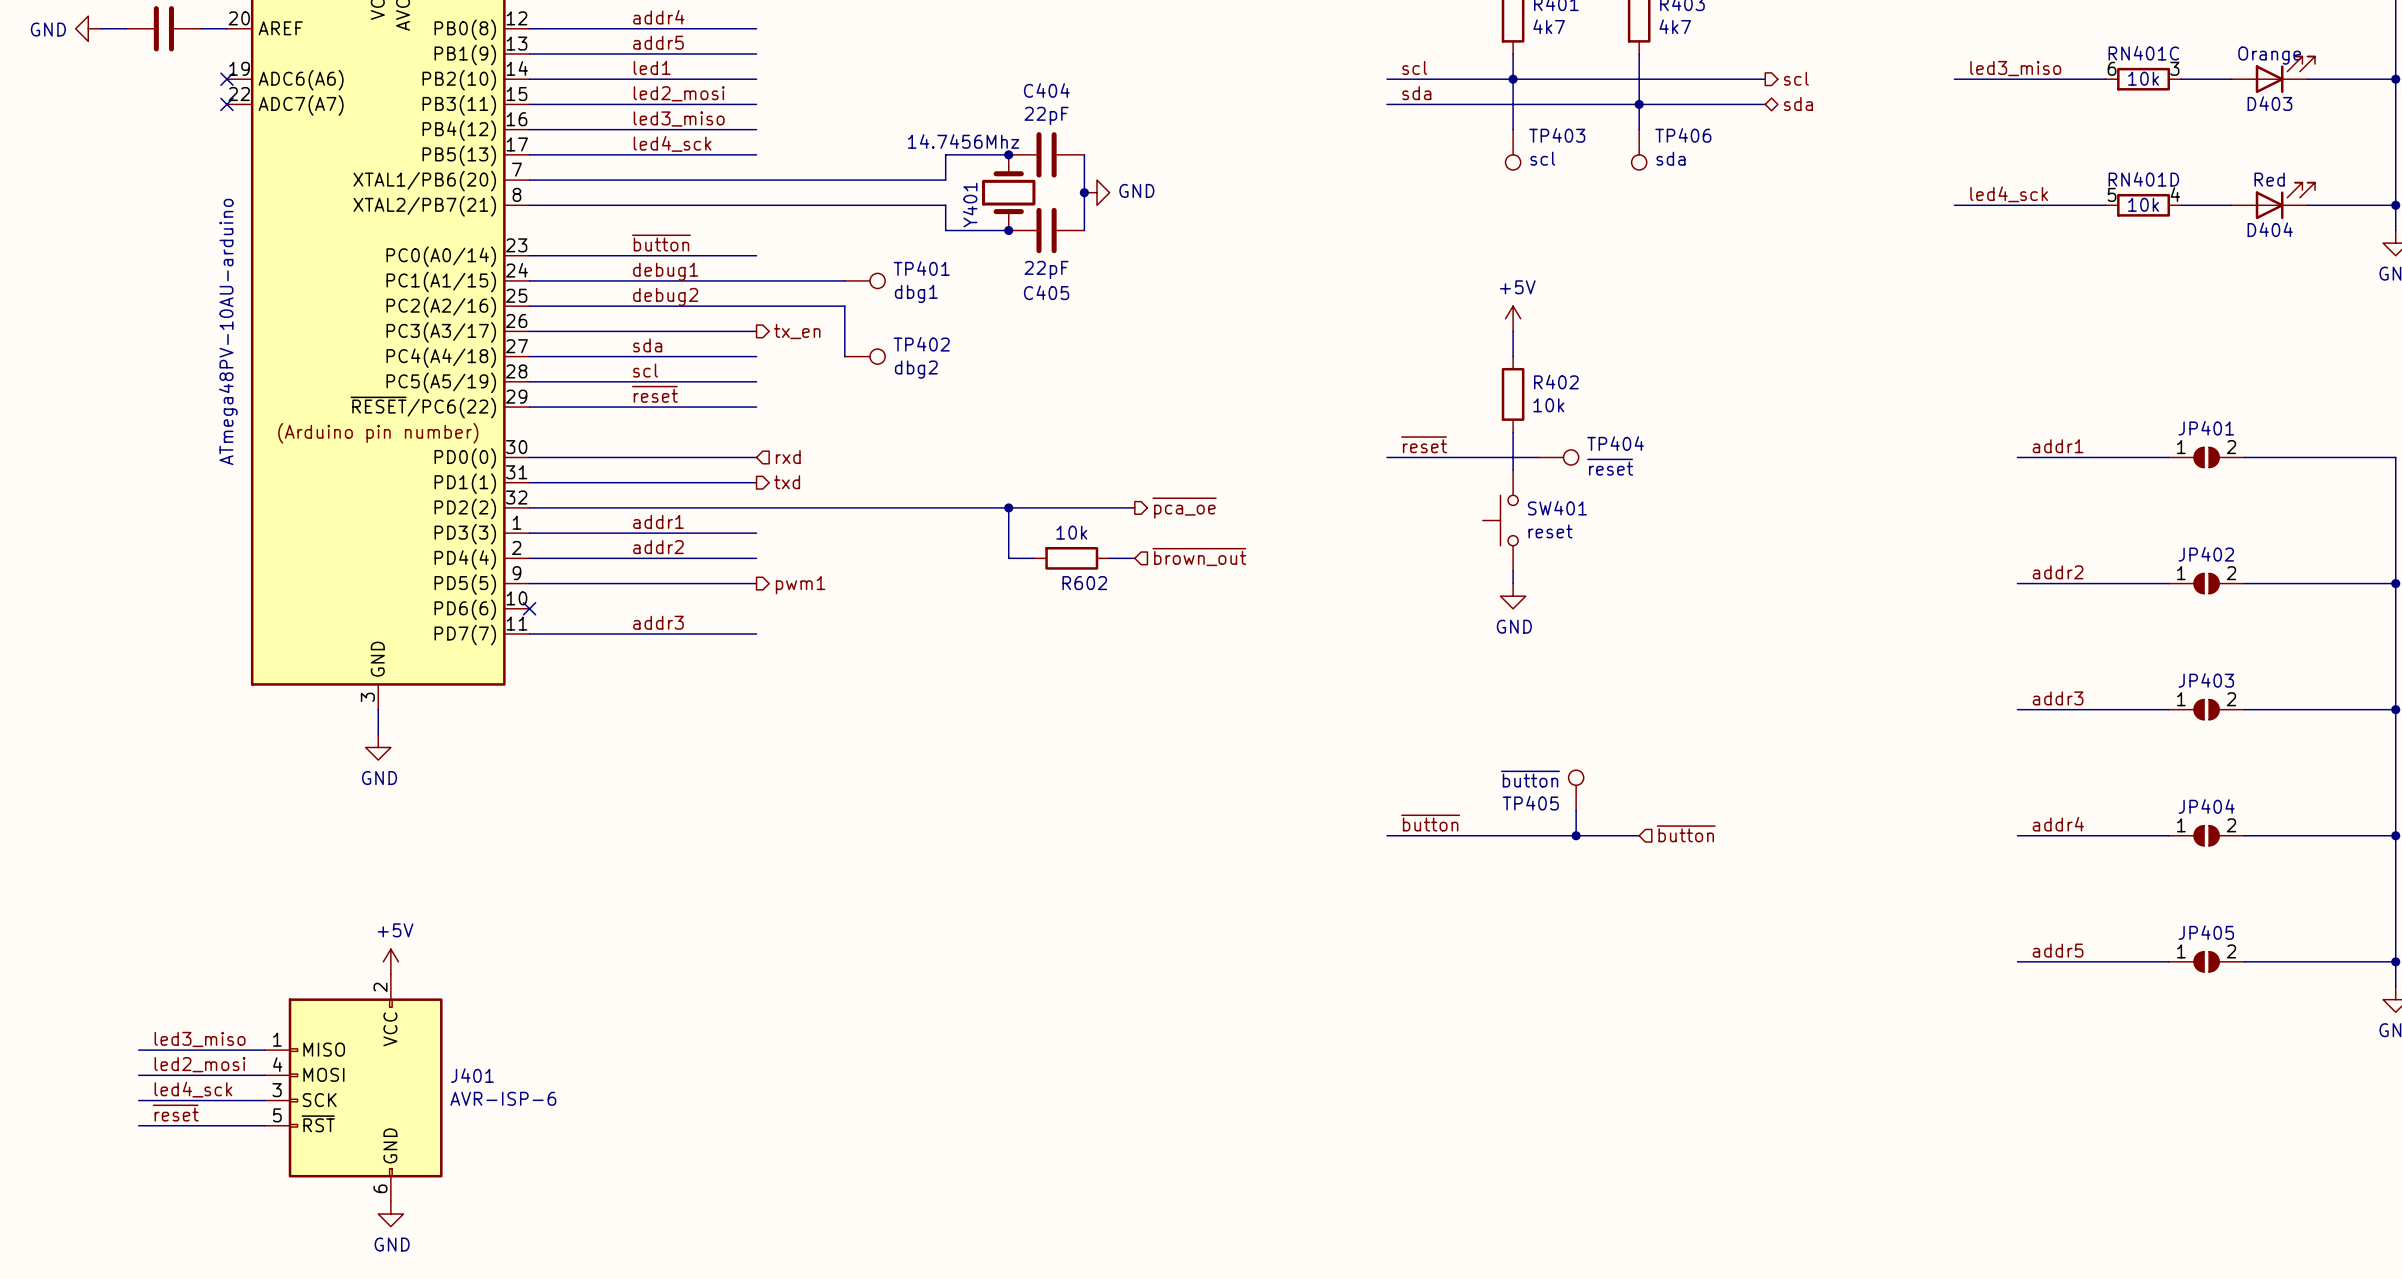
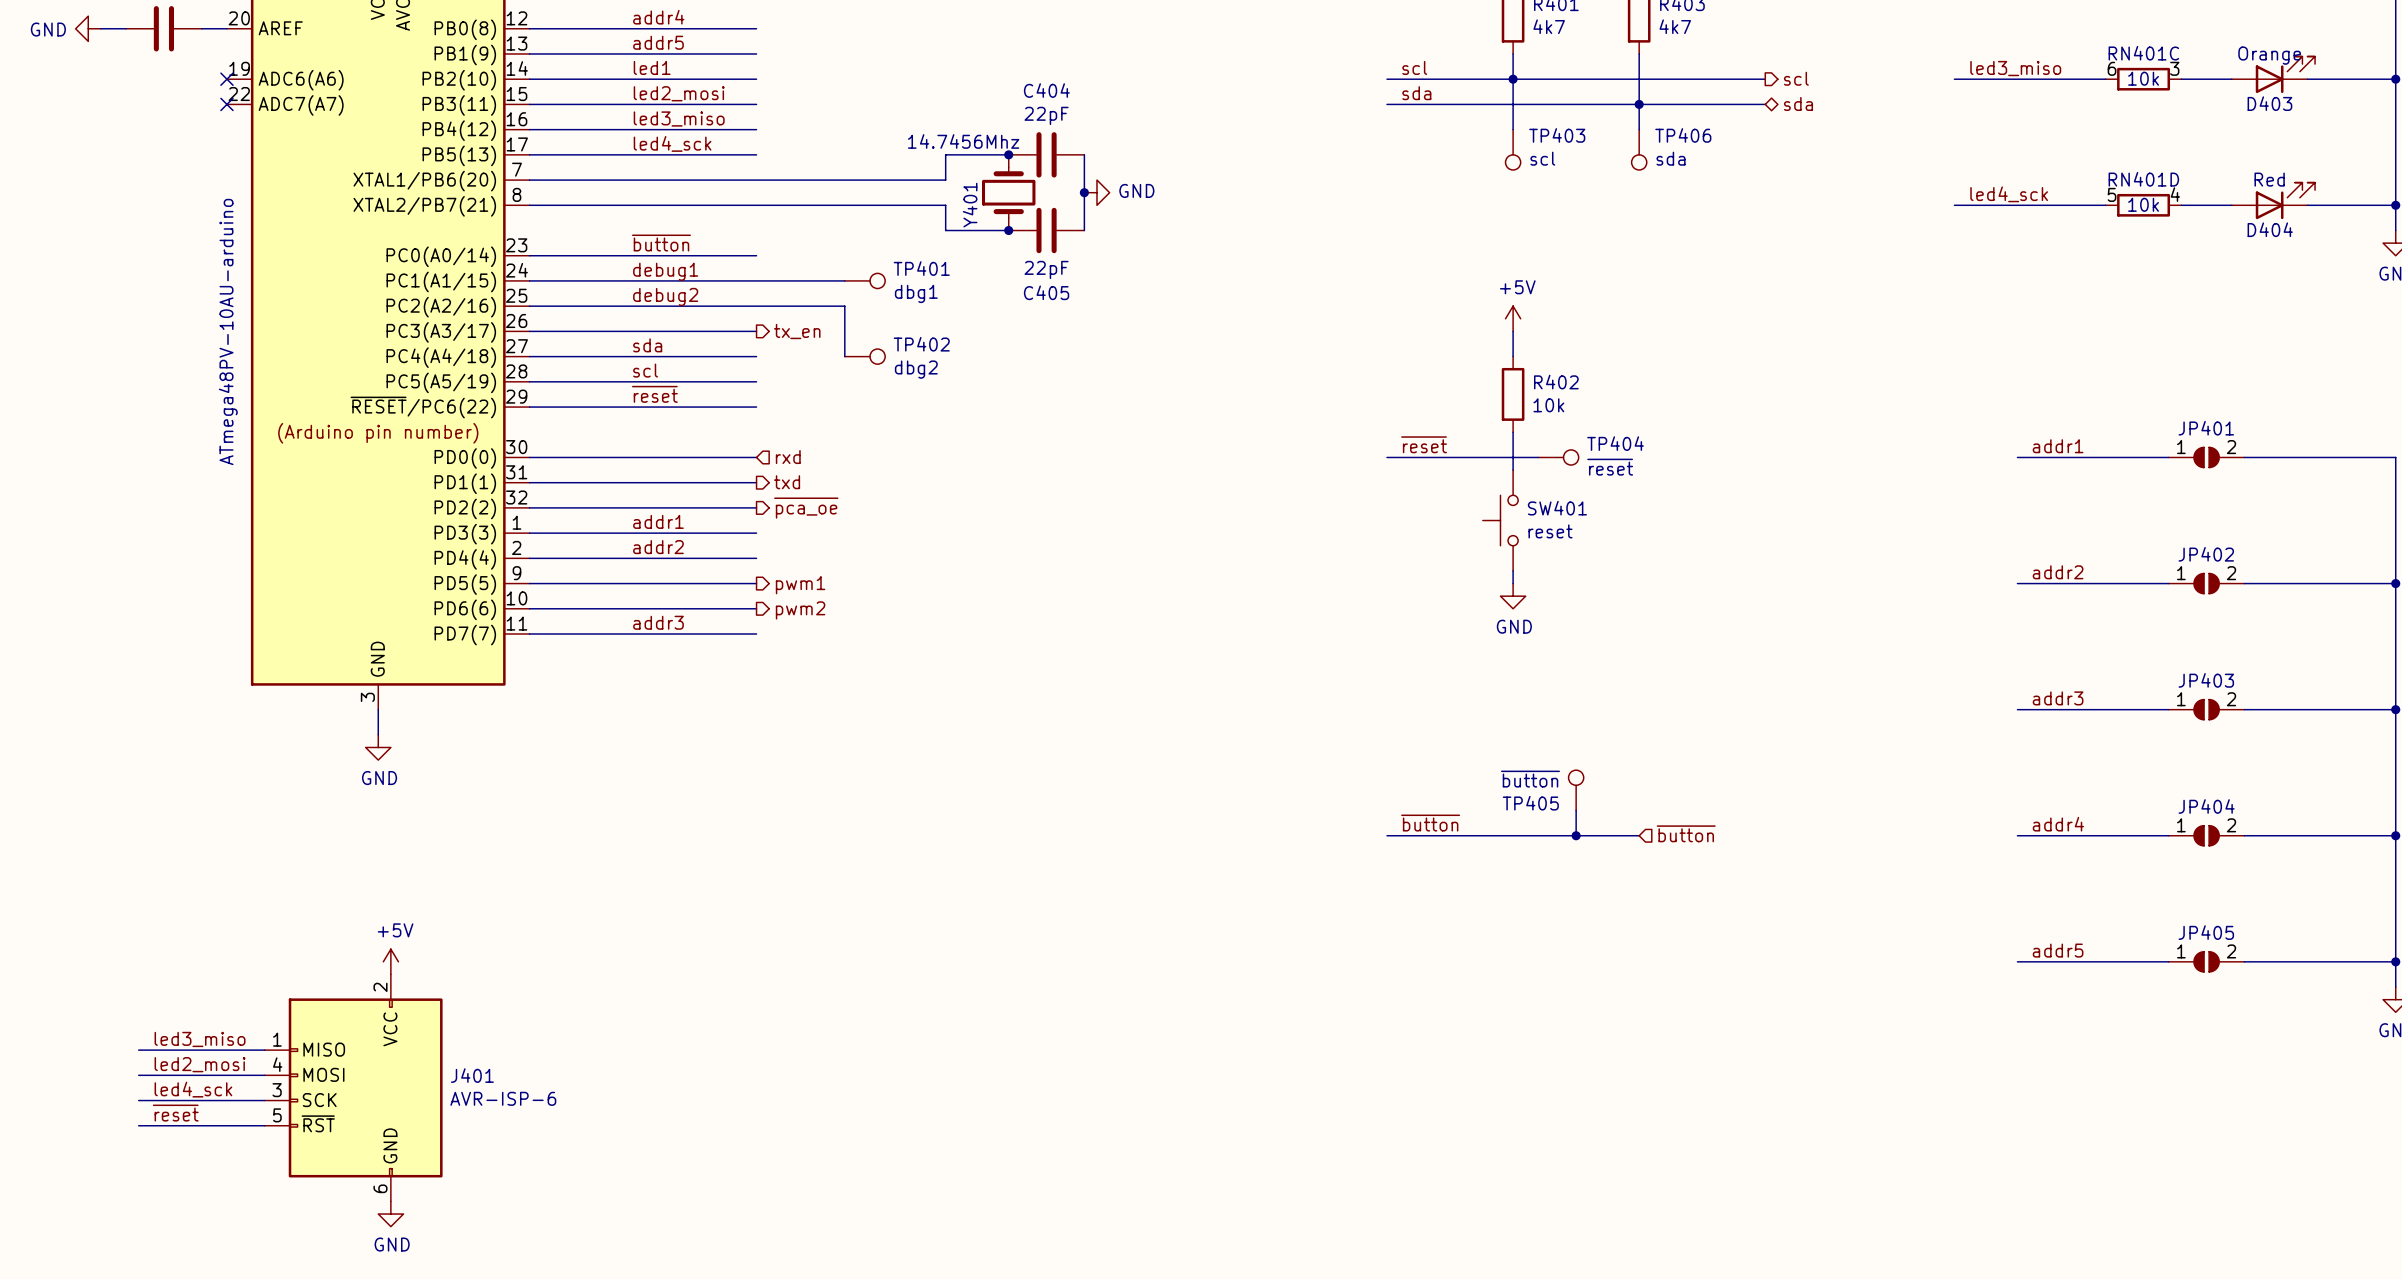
wire: (756, 507) (1134, 507) -> none
wire: (1008, 507) (1008, 558) (1033, 558) -> none
junction: (1008, 507) -> none
hierarchical label: none -> ~{pca_oe} (806, 508)
hierarchical label: ~{pca_oe} (1184, 508) -> none
hierarchical label: ~{brown_out} (1199, 557) -> none
R602: 10k (1071, 558) -> none
wire: (1109, 558) (1134, 558) -> none
wire: none -> (529, 608) (756, 608)
no-connect mark: (529, 608) -> none
hierarchical label: none -> pwm2 (800, 610)

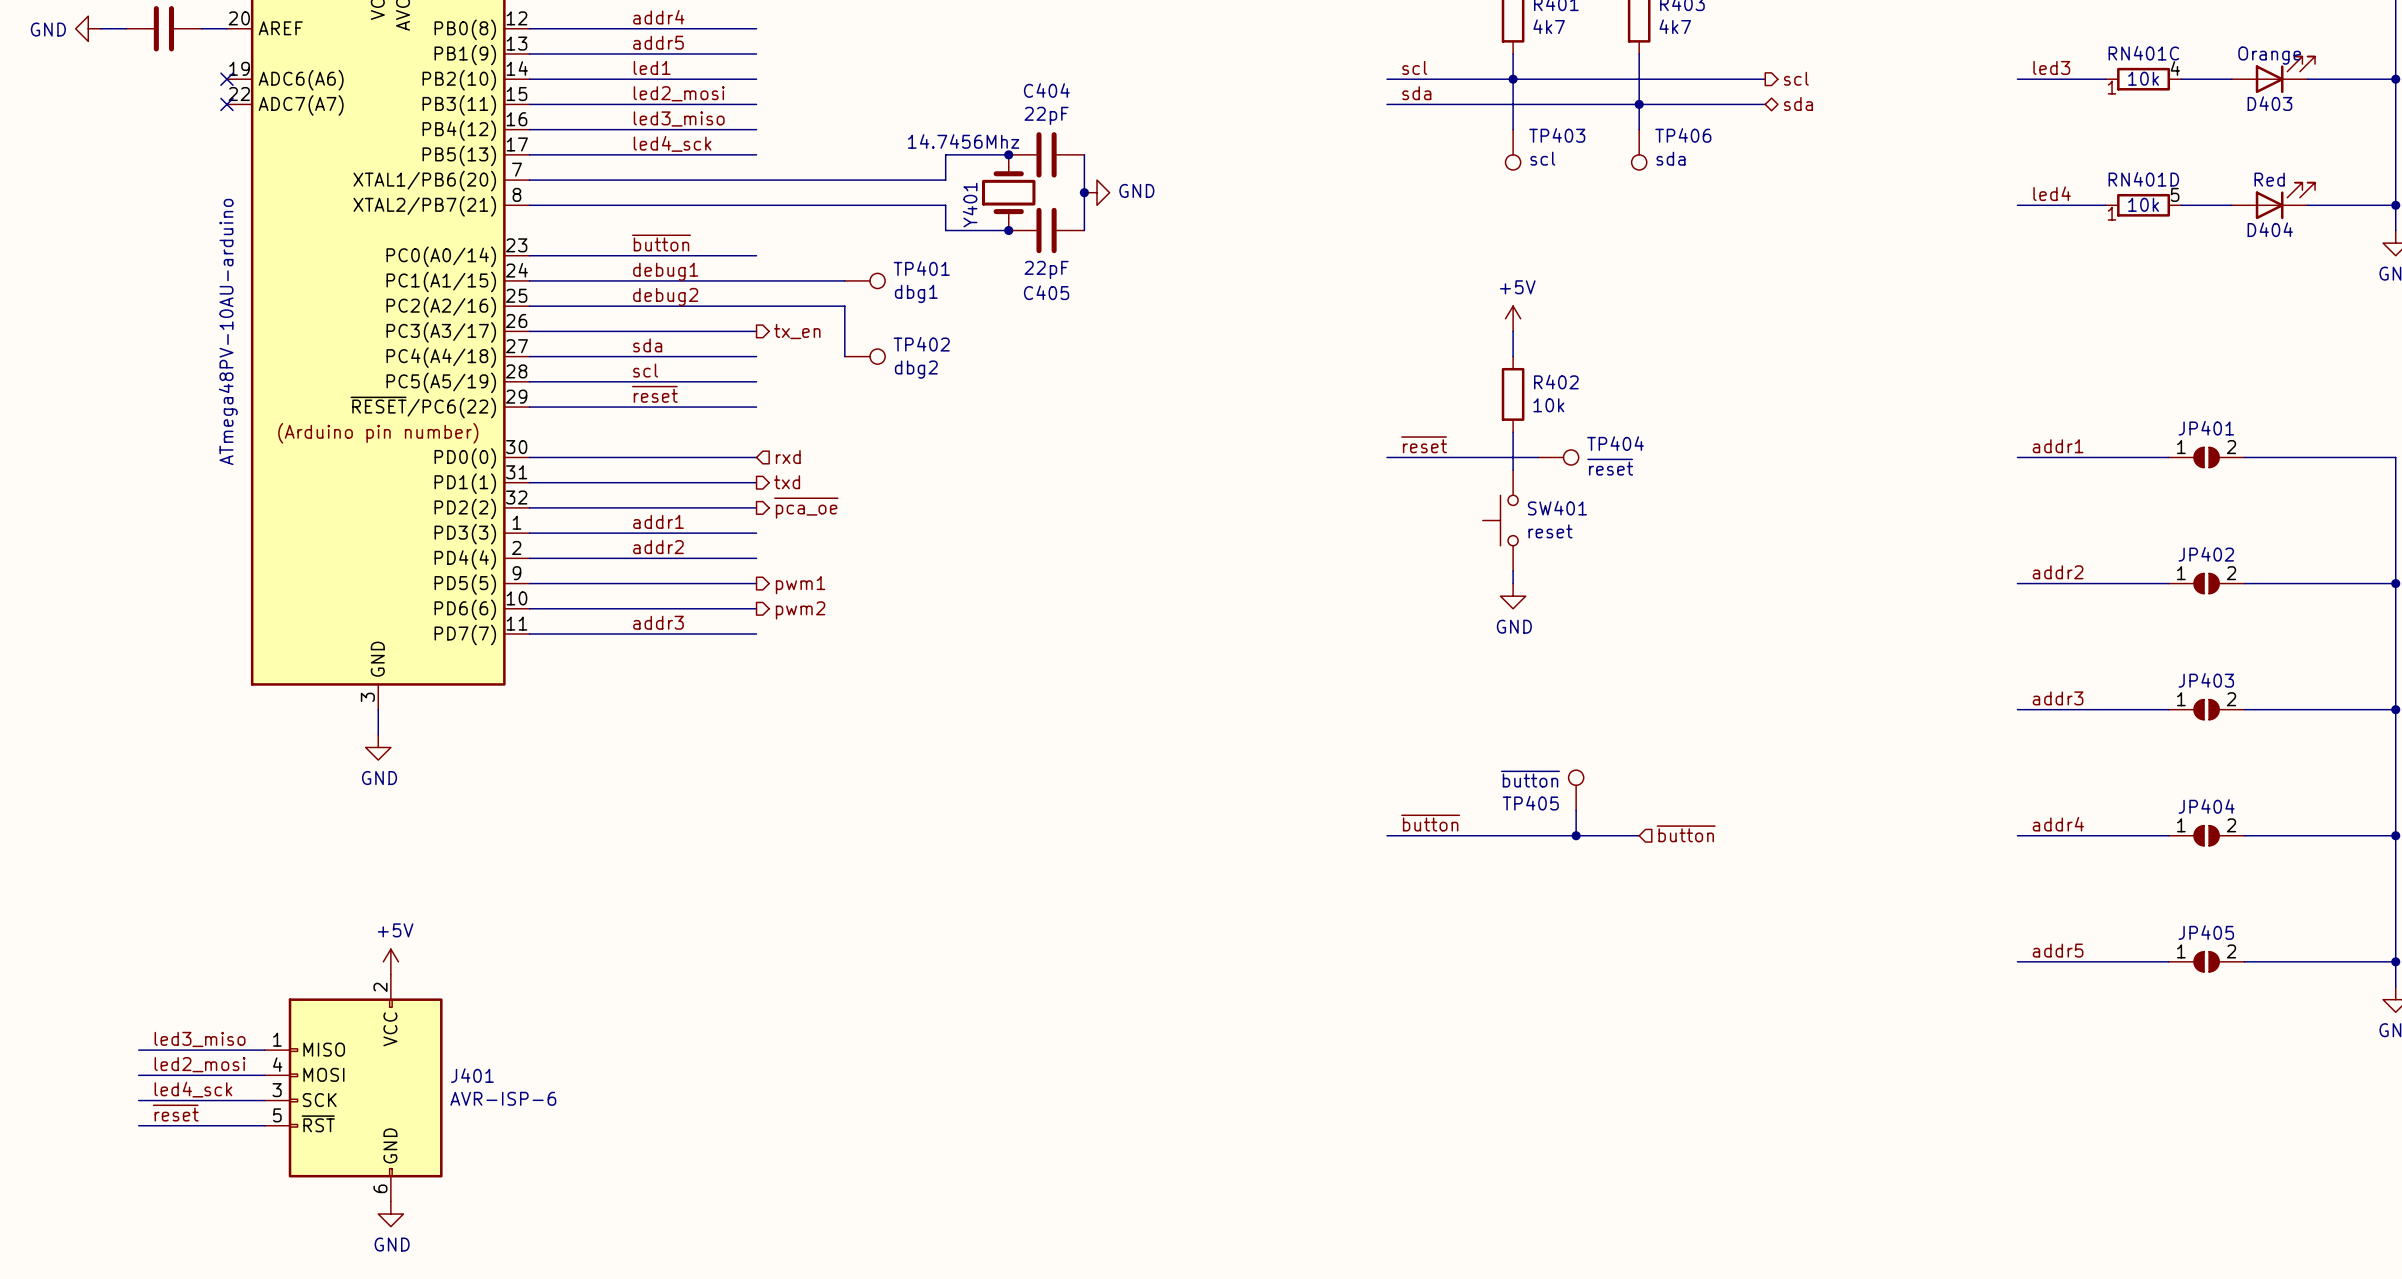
RN401C symbol: [2105, 67, 2182, 91] -> [2105, 67, 2182, 91]
label: led3_miso (2015, 68) -> led3 (2051, 67)
wire: (1954, 79) (2017, 79) -> none
RN401D symbol: [2105, 193, 2182, 217] -> [2105, 193, 2182, 217]
label: led4_sck (2009, 194) -> led4 (2052, 193)
wire: (1954, 205) (2017, 205) -> none

